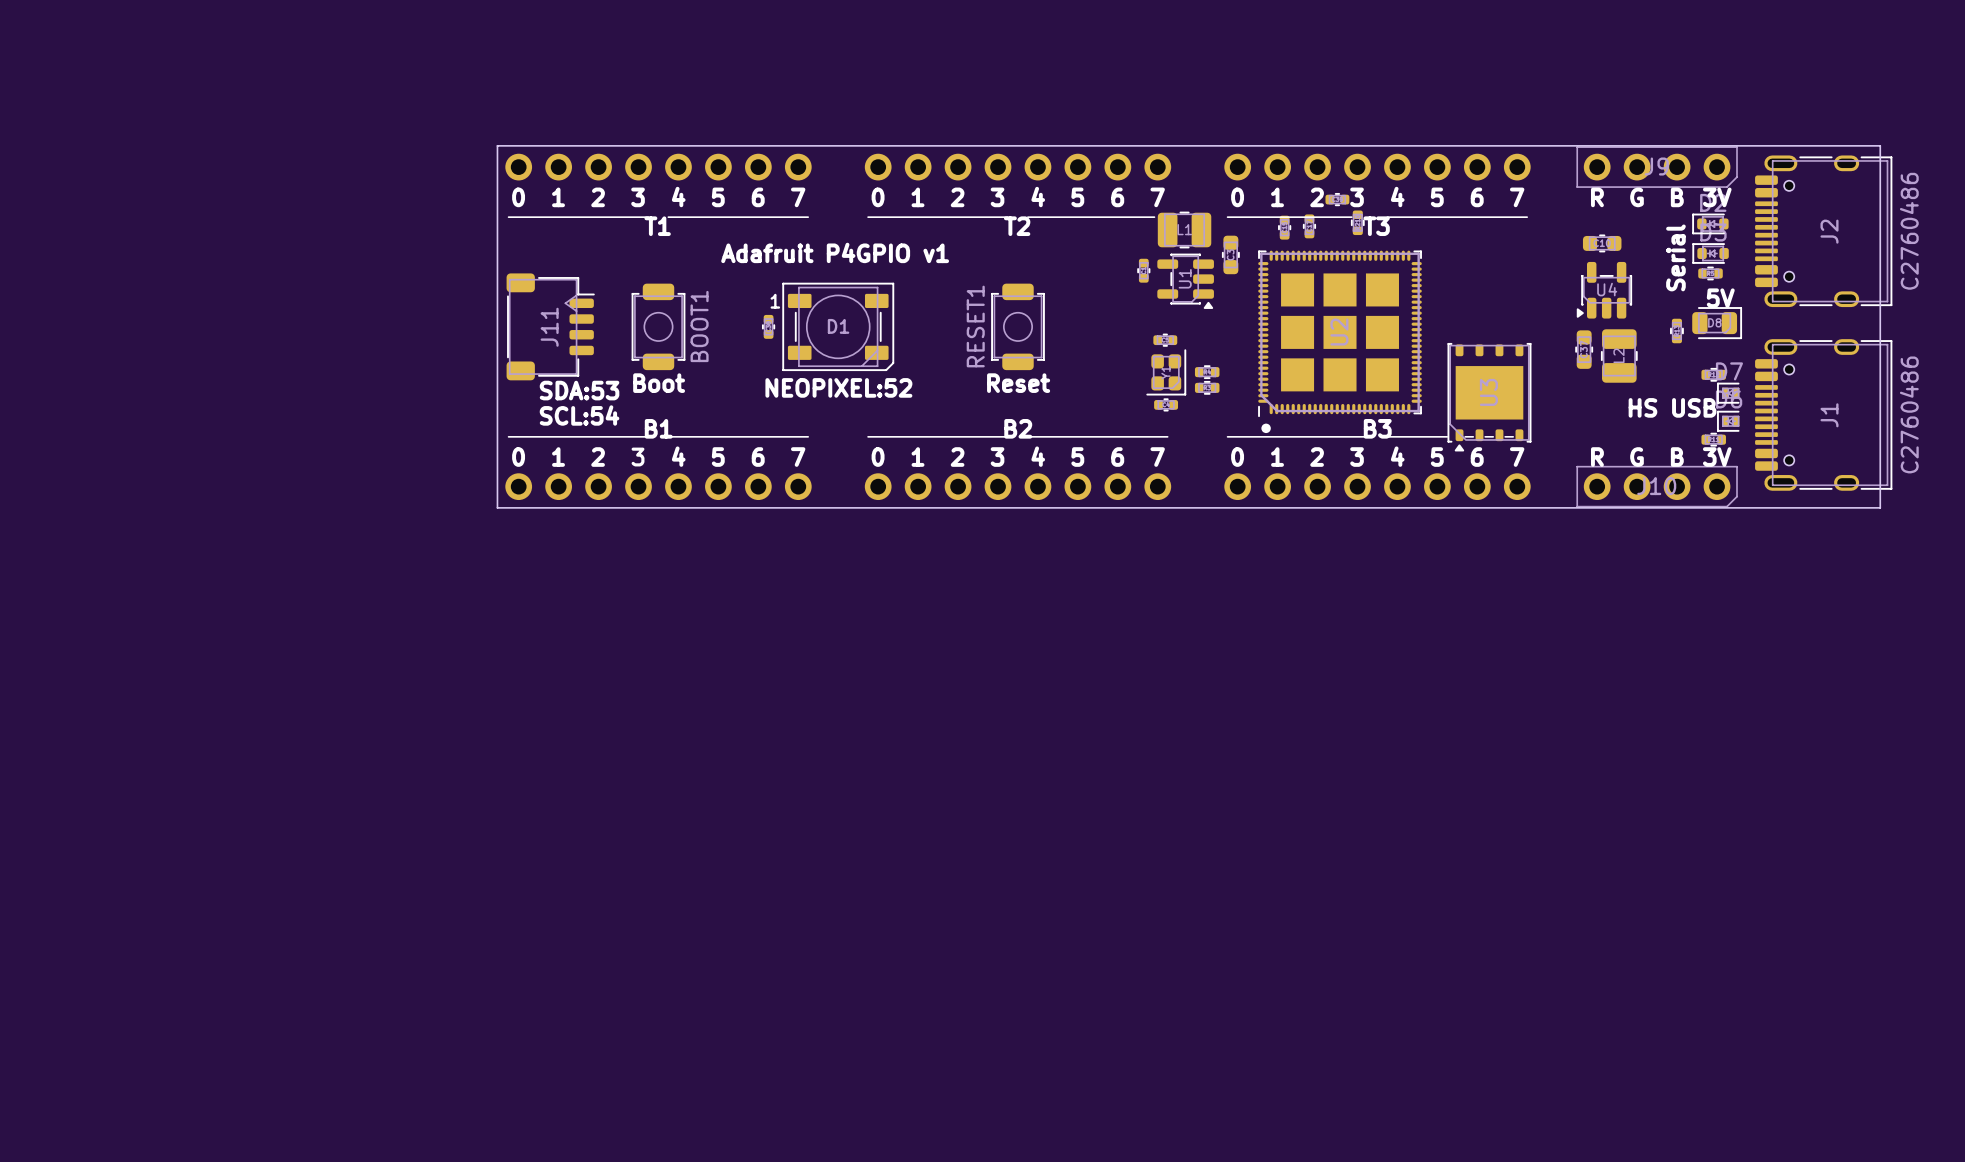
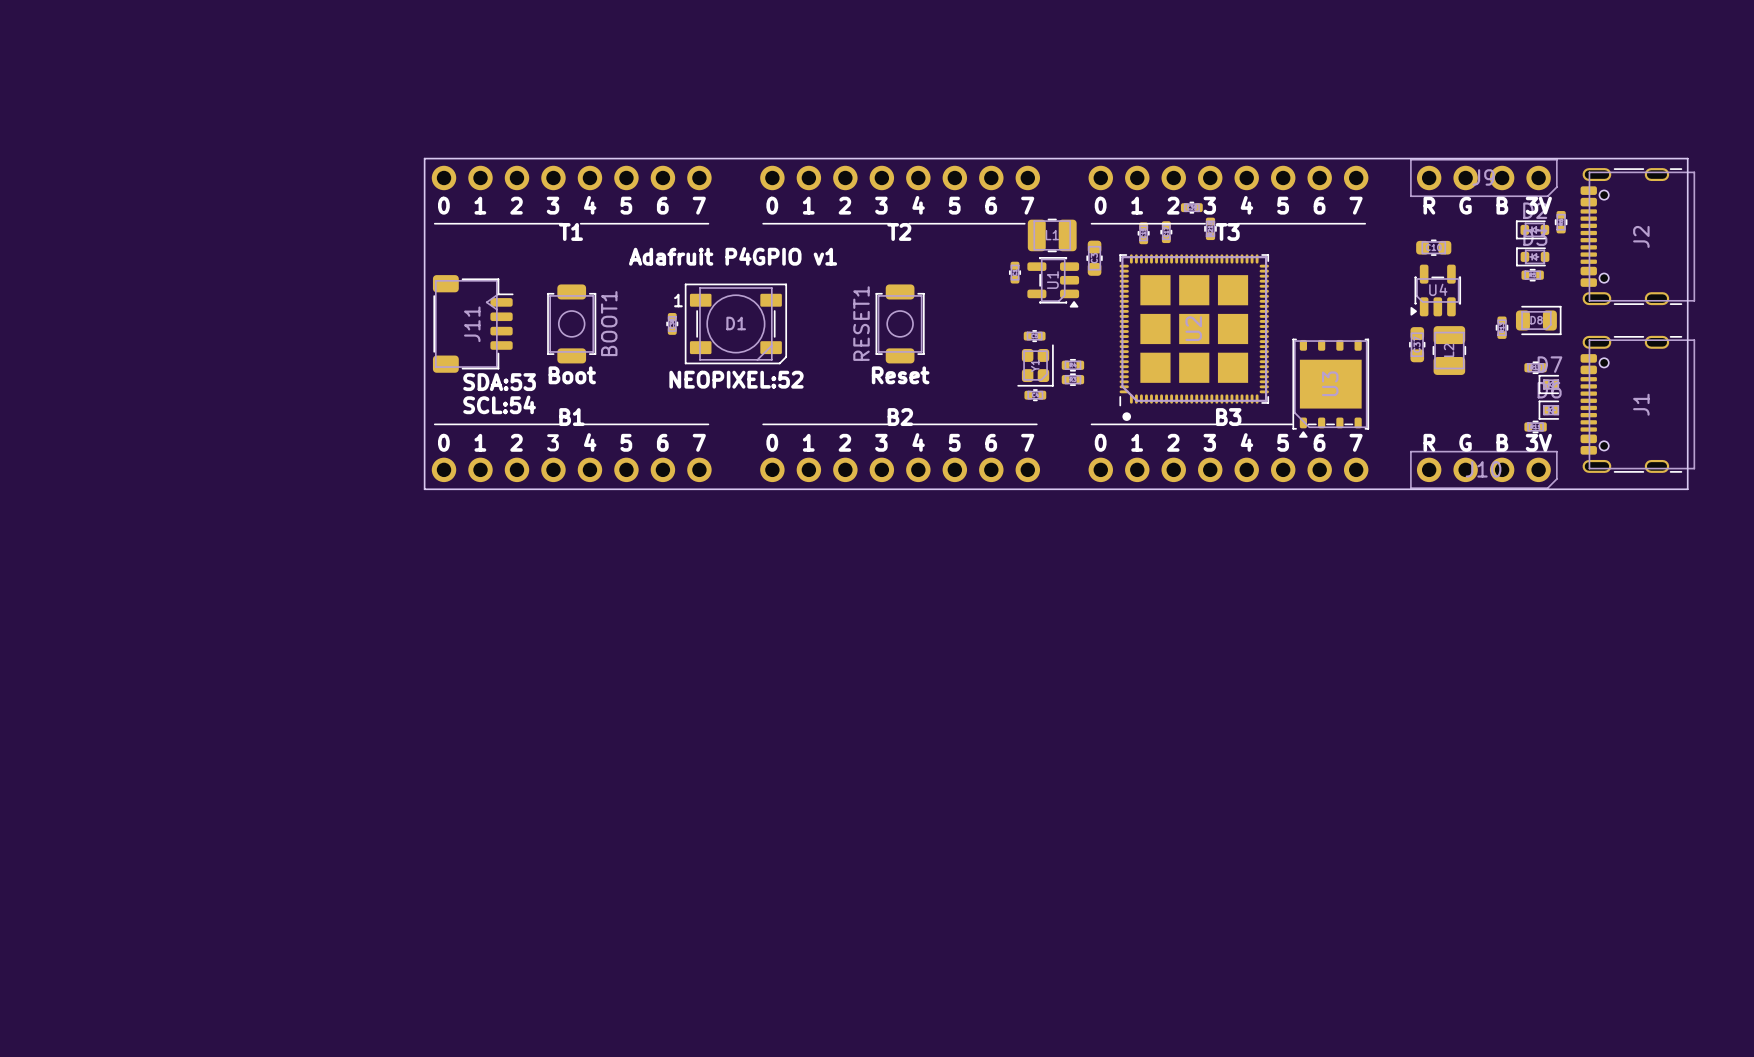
J2 footprint: [1755, 155, 1893, 308] -> [1580, 168, 1696, 306]
part: none -> (1561, 222)
J2 value: C2760486 (1909, 231) -> none
text: Serial (1675, 257) -> none
text: 5V (1720, 298) -> none
J1 footprint: [1755, 339, 1893, 491] -> [1580, 335, 1696, 473]
text: HS USB (1672, 407) -> none
J1 value: C2760486 (1909, 414) -> none

